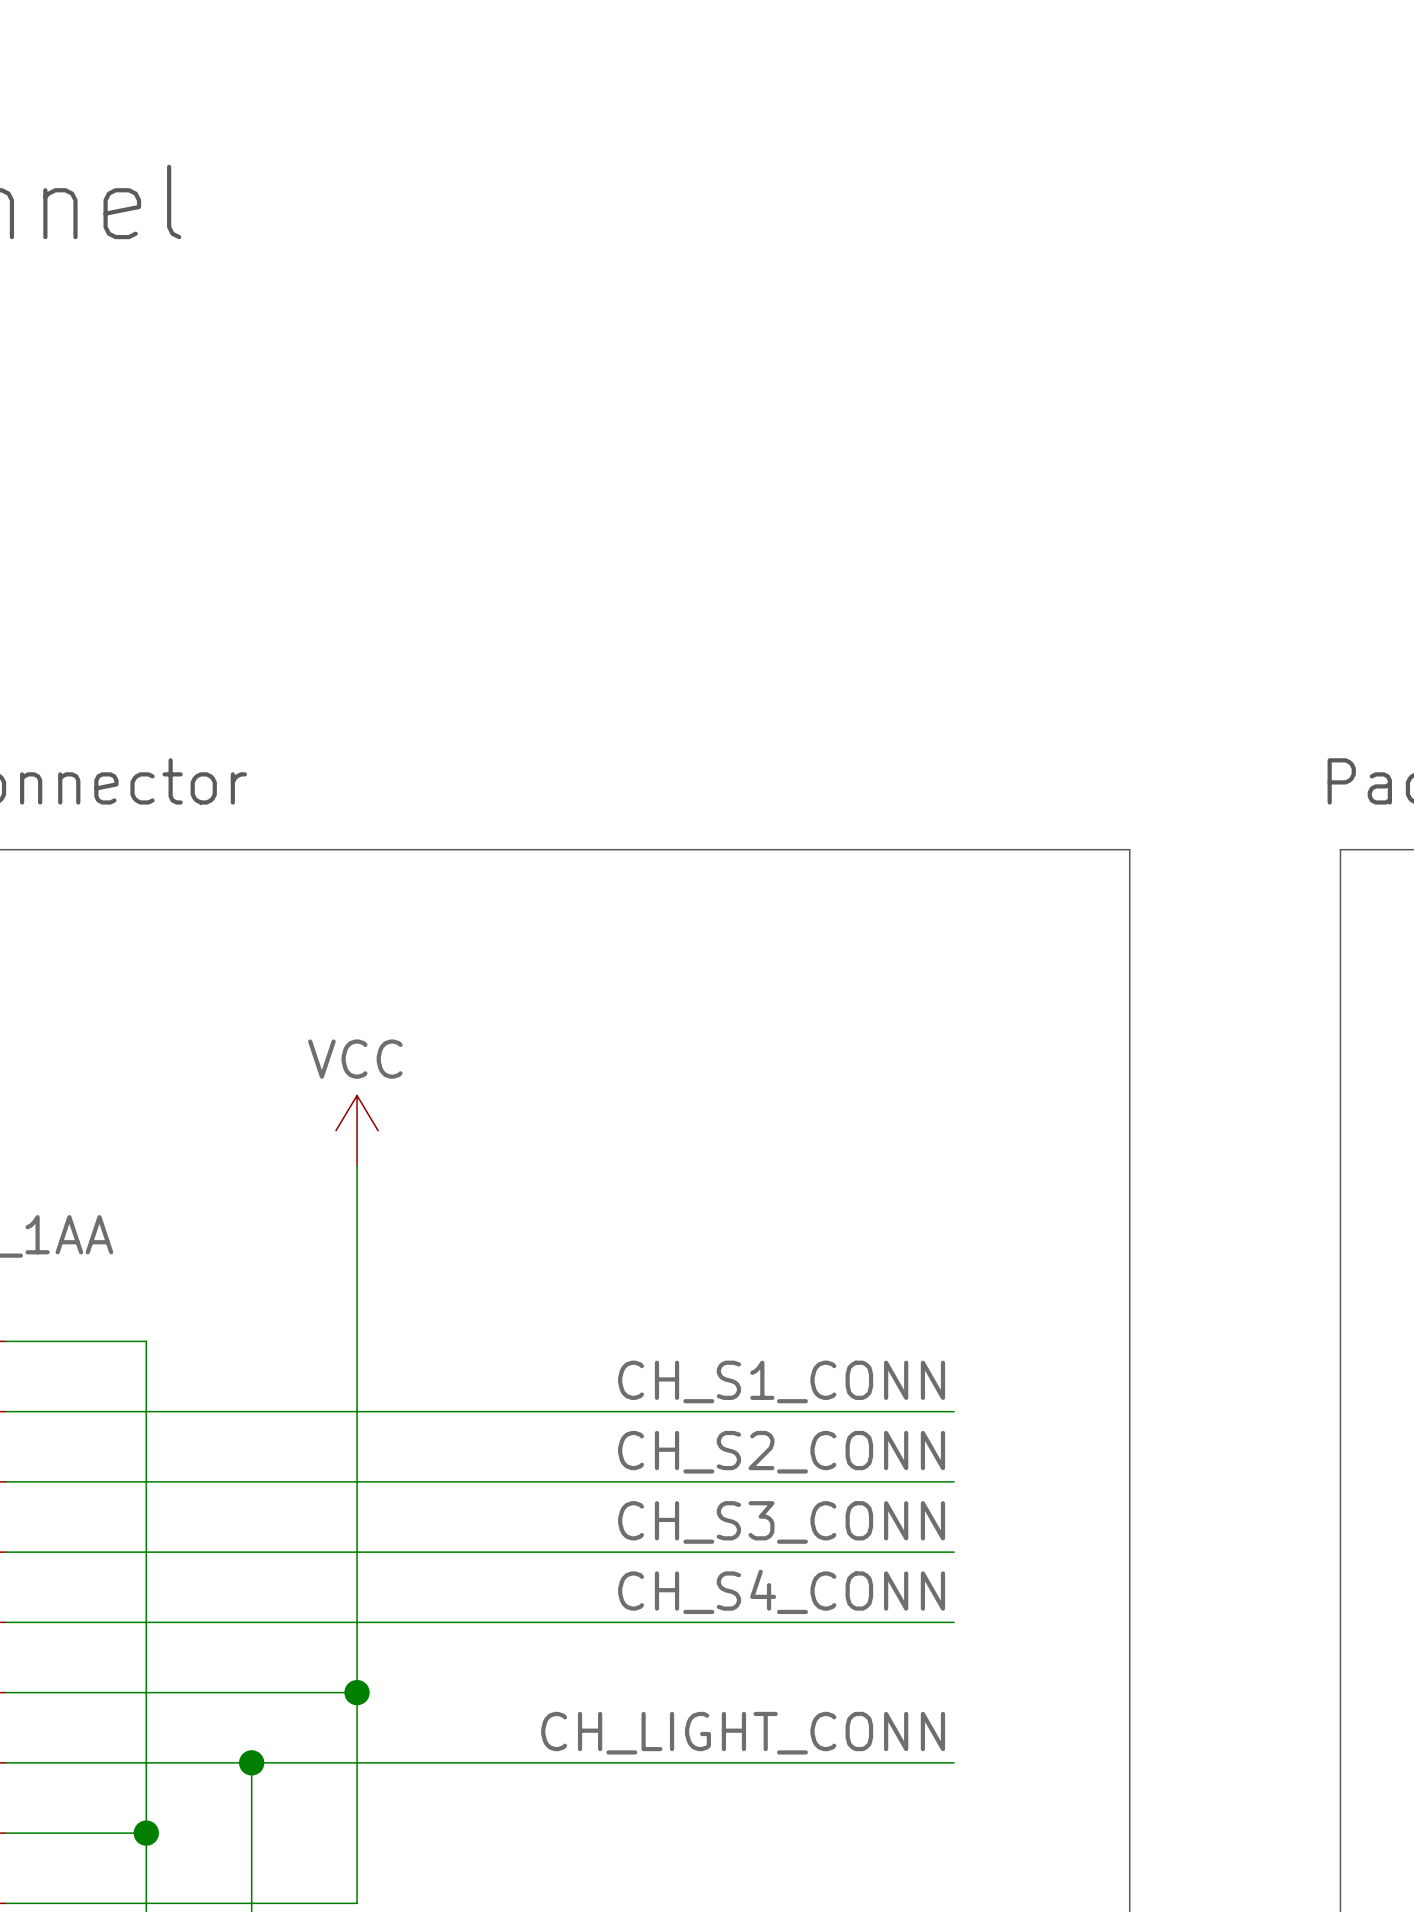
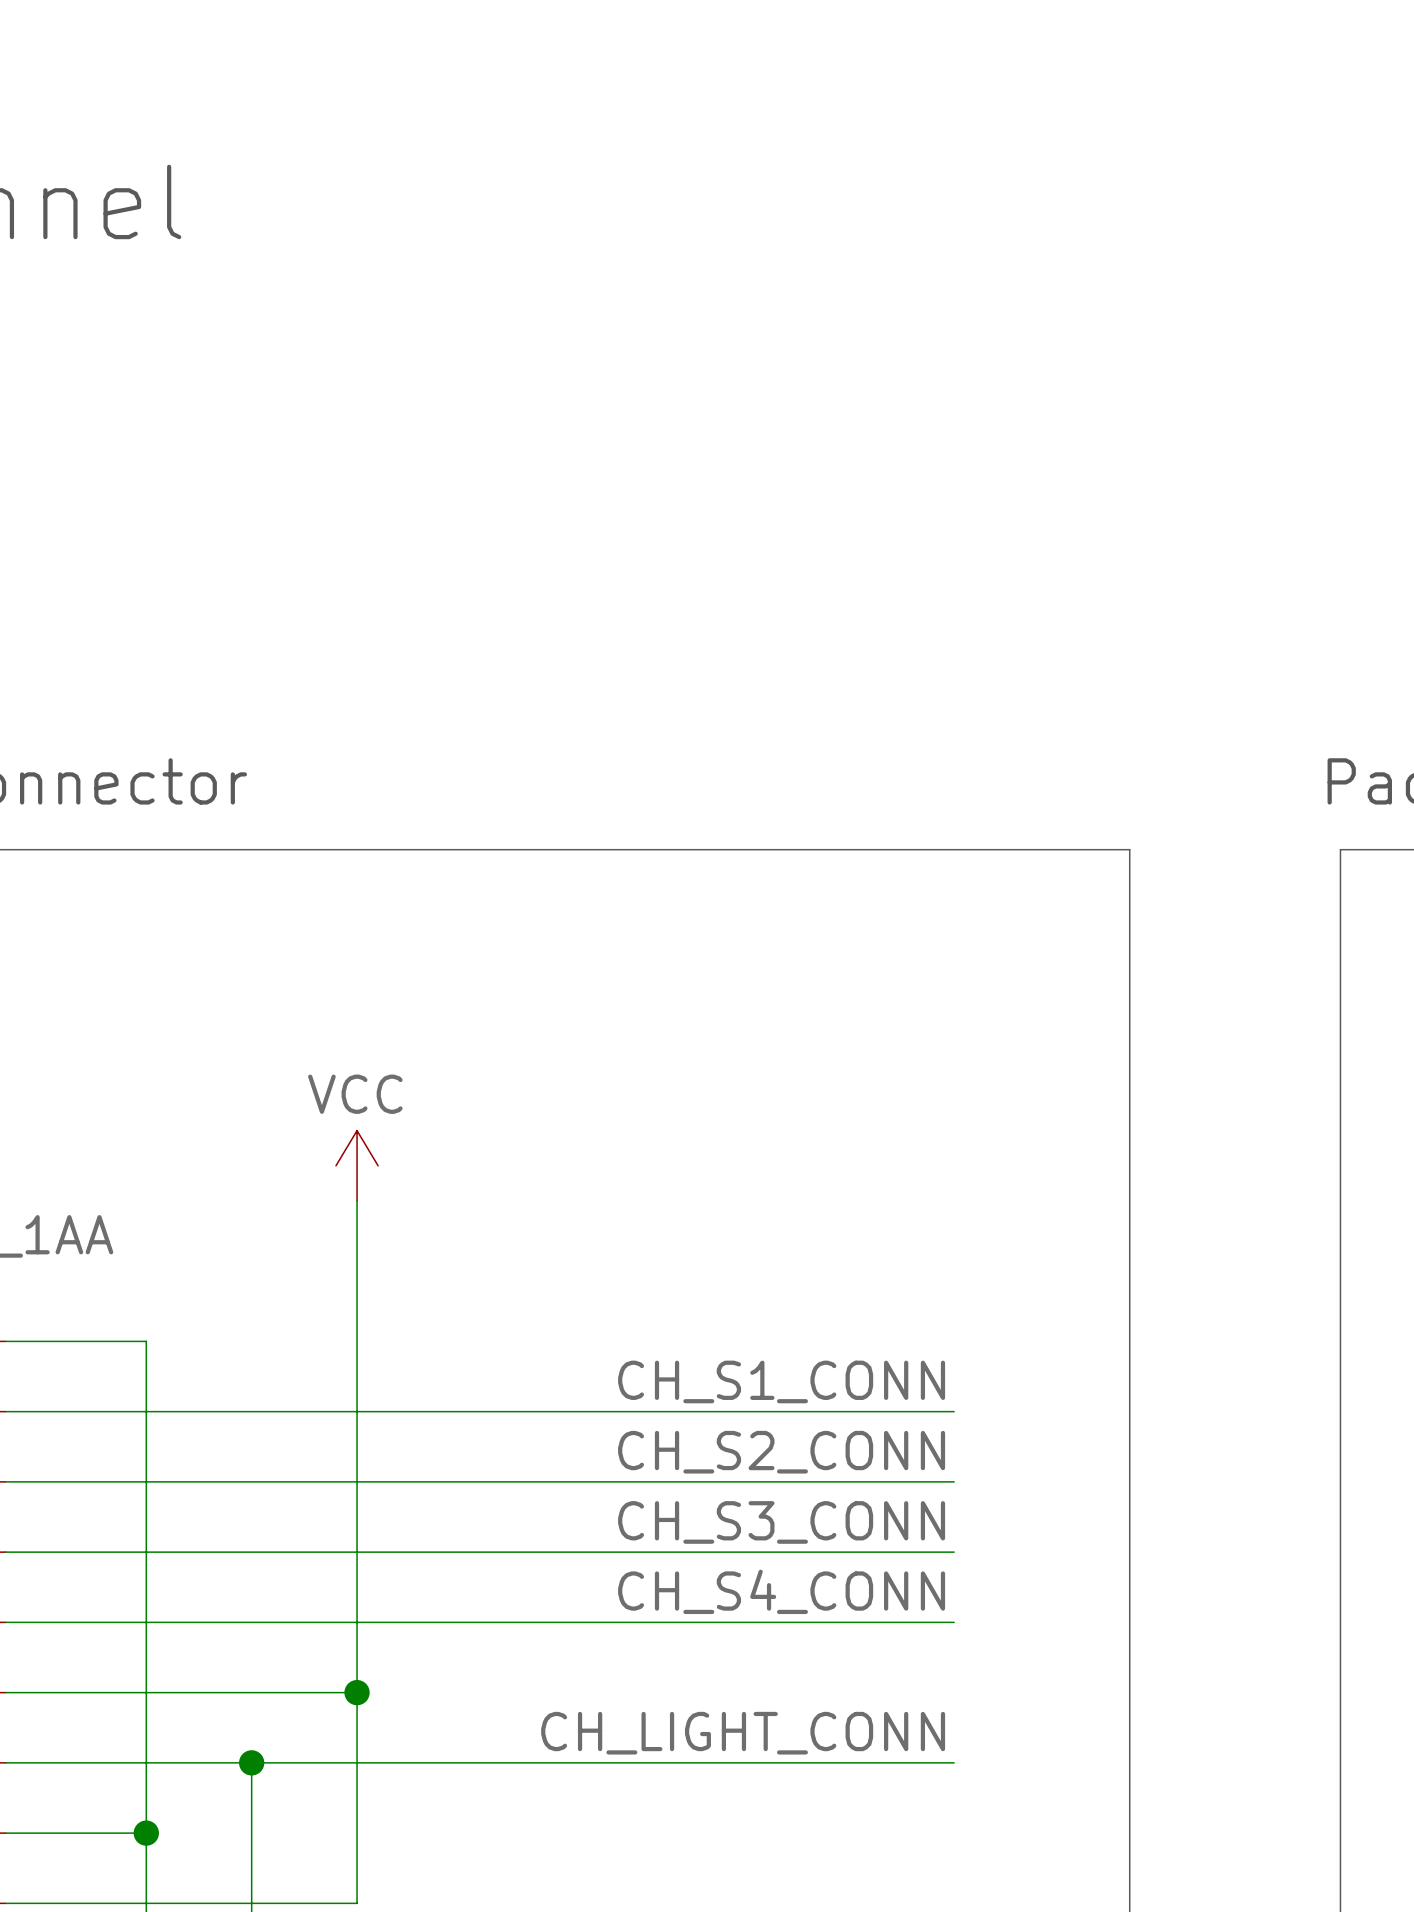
power symbol position: VCC (357, 1130) -> VCC (357, 1165)

